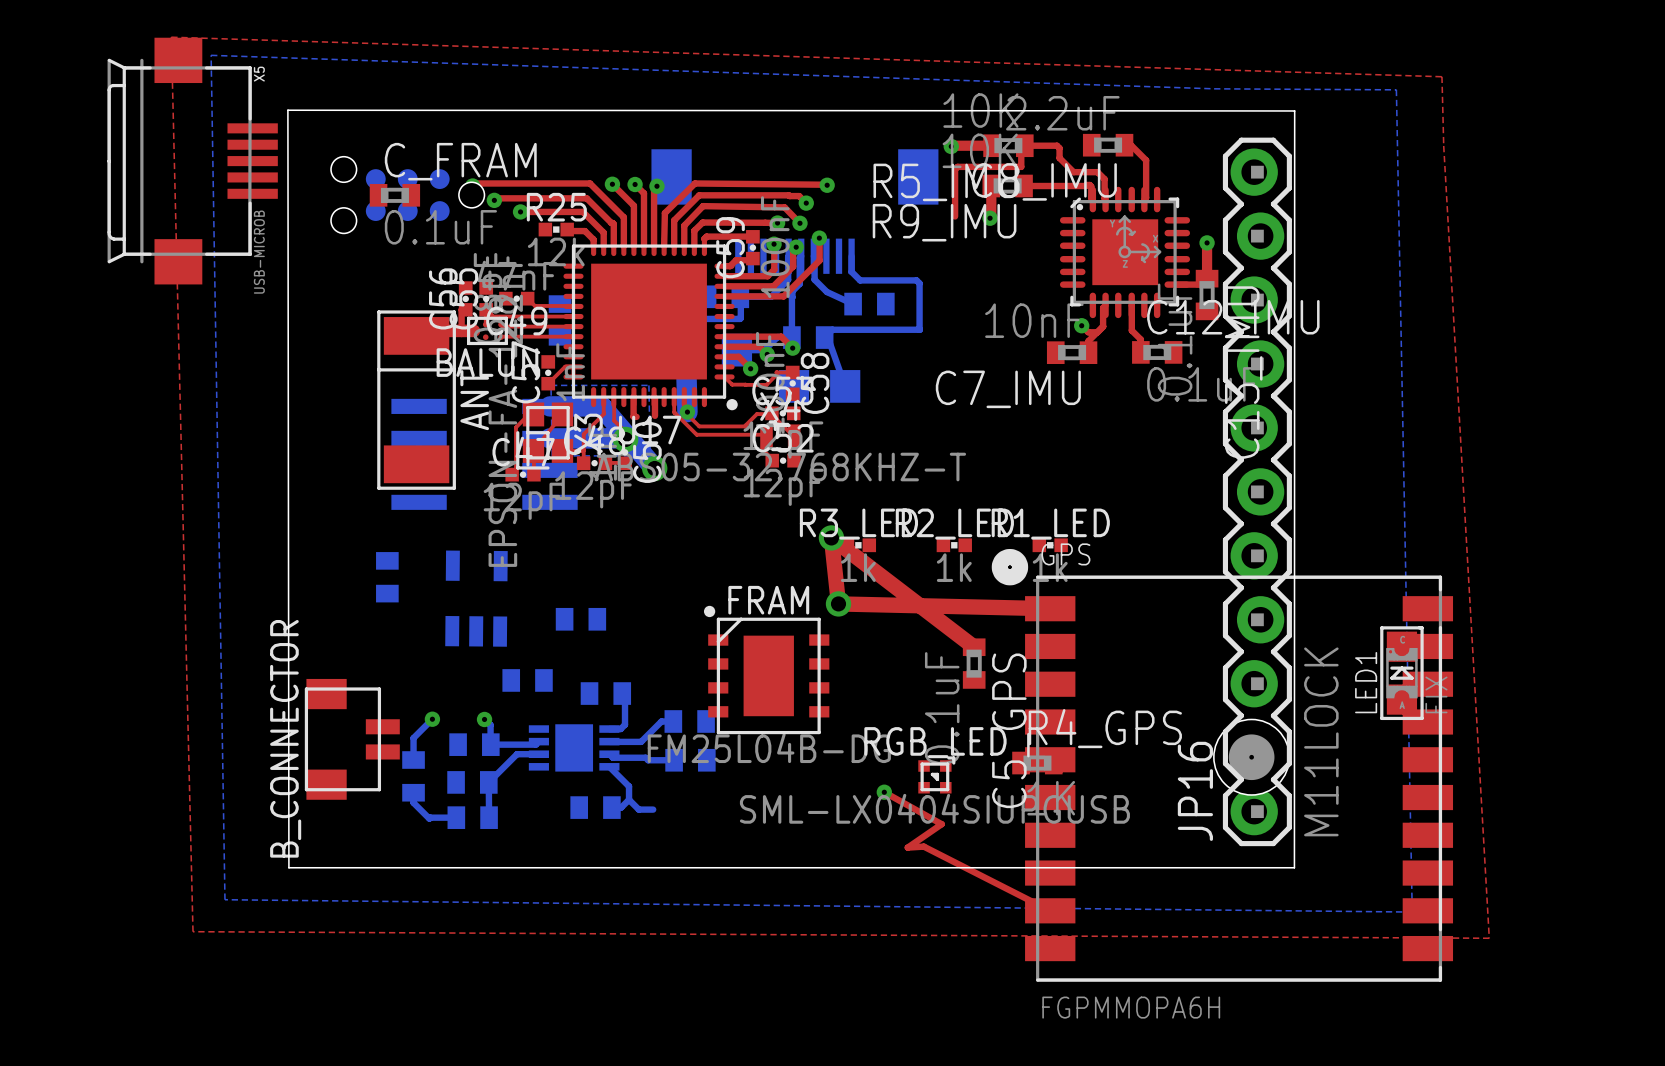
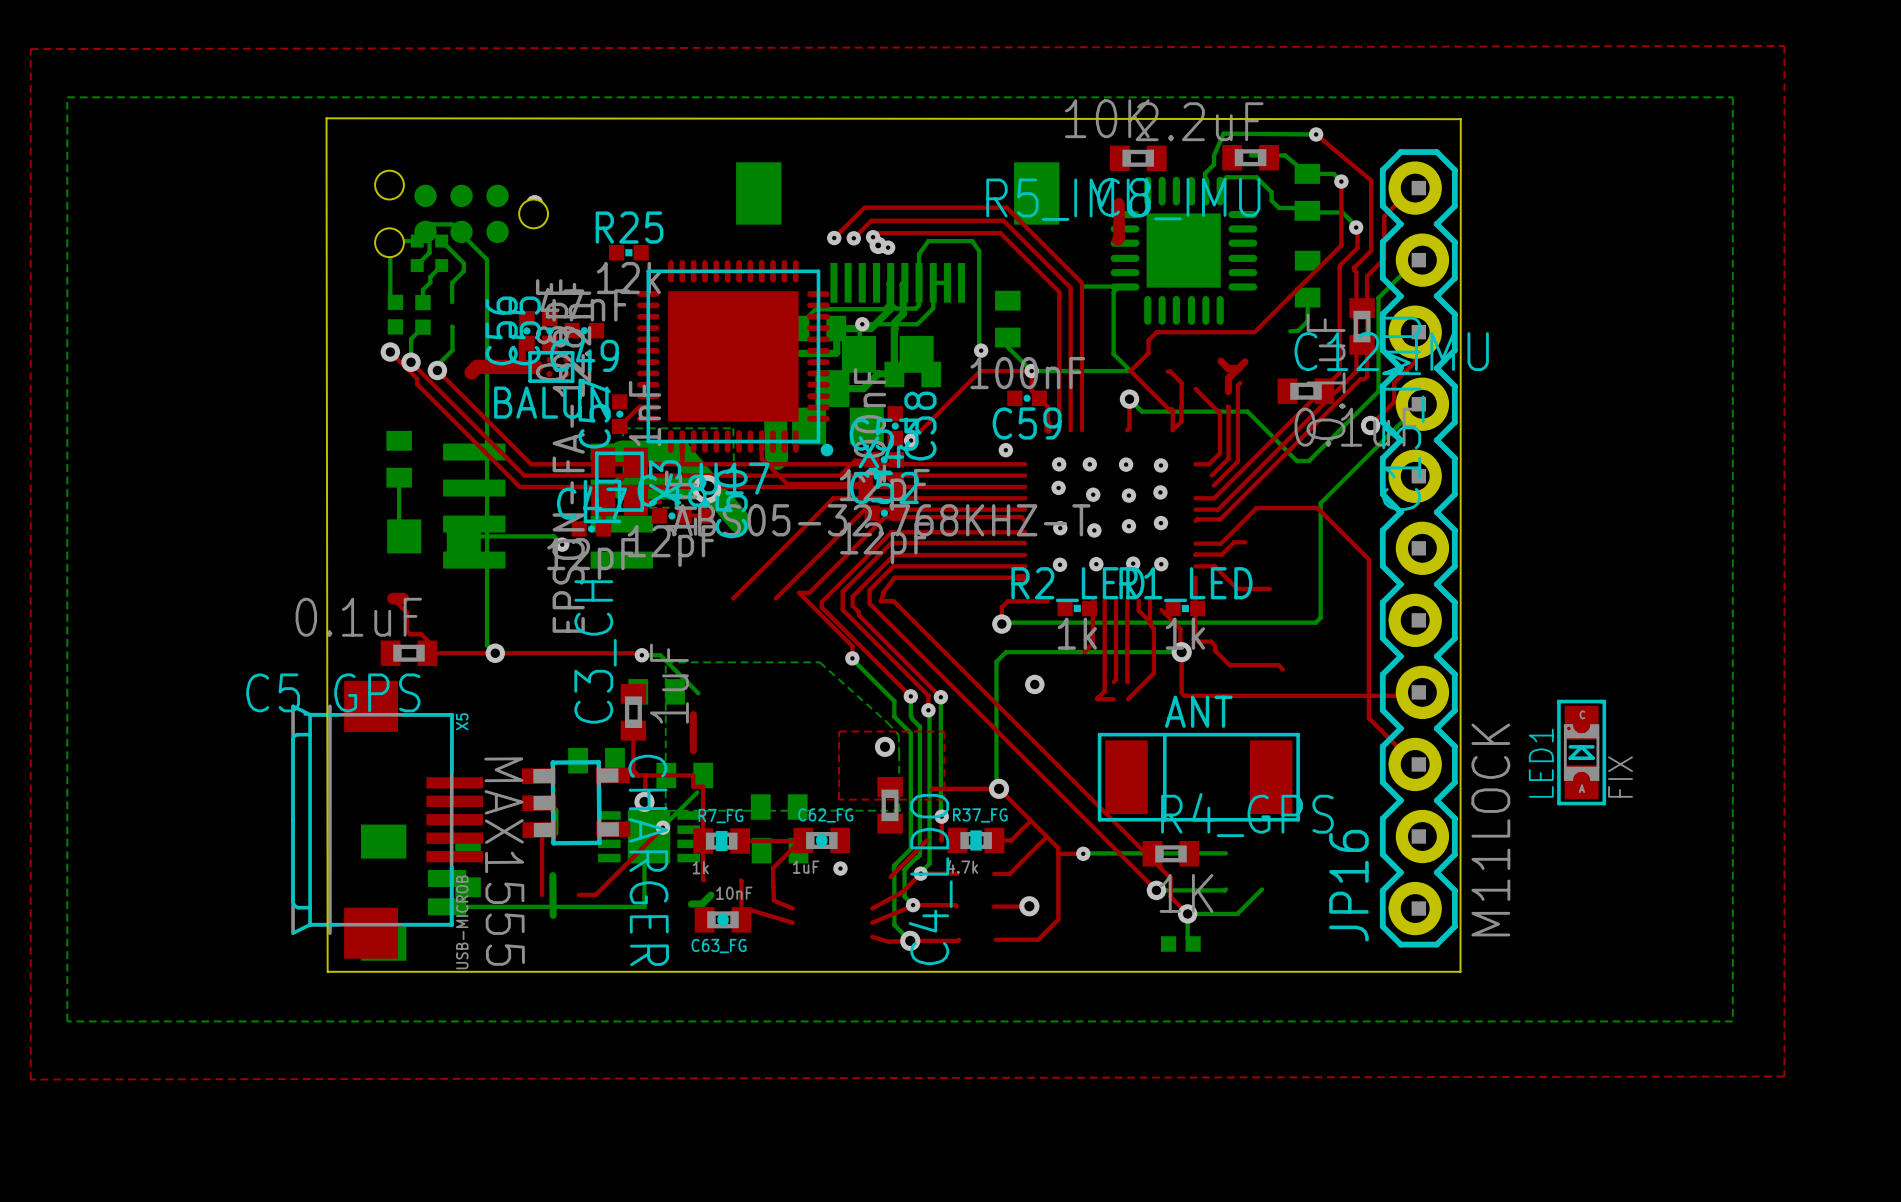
top zone outline: (171, 37) (1441, 76) (1443, 145) (1489, 938) (193, 931) (171, 37) -> (1784, 45) (30, 49) (30, 1079) (1784, 1076) (1784, 45)
bottom zone outline: (211, 55) (1214, 88) (1396, 89) (1412, 912) (224, 899) (211, 55) -> (67, 97) (67, 1021) (1732, 1021) (1732, 97) (67, 97)
top track: none -> (1316, 134) (1371, 180) (1371, 250) (1354, 267) (1356, 272) (1356, 371) (1218, 509) (1195, 509)
bottom track: none -> (1316, 134) (1223, 133) (1214, 155) (1214, 164) (1205, 173) (1205, 191)
via: none -> (1316, 134)
bottom track: none -> (1250, 155) (1285, 155) (1307, 173) (1333, 173) (1341, 181)
top track: (992, 145) (951, 146) -> none
top track: (1124, 145) (1131, 145) (1146, 160) (1146, 197) (1144, 199) -> none
via: (951, 146) -> none
X5 position: (192, 161) -> (387, 819)
top track: none -> (1341, 181) (1341, 245) (1254, 332) (1156, 332) (1148, 340) (1148, 353) (1130, 371) (1168, 409) (1172, 410) (1172, 430) (1181, 421) (1181, 406)
via: none -> (1341, 181)
top track: none -> (1415, 188) (1412, 188) (1384, 216) (1384, 259) (1367, 276) (1367, 376) (1364, 379) (1360, 379) (1220, 519) (1195, 520)
bottom track: none -> (1220, 191) (1220, 183) (1226, 177) (1256, 177) (1271, 192) (1271, 200) (1278, 207) (1292, 207) (1309, 212) (1342, 212) (1356, 227)
top track: (612, 184) (633, 205) (633, 246) -> none
via: (612, 184) -> none
top track: (635, 184) (643, 193) (643, 246) -> none
via: (635, 184) -> none
top track: (827, 184) (695, 183) (664, 213) (664, 246) -> none
via: (827, 185) -> none
top track: (472, 186) (475, 183) (590, 183) (623, 217) (623, 246) -> none
top track: (656, 186) (654, 189) (654, 246) -> none
via: (656, 186) -> none
R9_IMU side: top (1007, 186) -> bottom (1307, 192)
top track: (1024, 186) (1089, 185) (1092, 199) -> none
C_FRAM: 0.1uF (394, 195) -> none
top track: (1105, 199) (1104, 179) (1097, 172) (1073, 172) (1059, 158) (1059, 148) (1057, 145) (1024, 145) (1024, 150) (1021, 153) (1021, 166) (957, 166) (955, 169) (955, 216) -> none
top track: (494, 200) (496, 198) (586, 198) (613, 224) (613, 246) -> none
via: (494, 200) -> none
top track: (806, 203) (799, 196) (788, 195) (699, 195) (674, 220) (674, 246) -> none
via: (806, 203) -> none
top track: none -> (1356, 227) (1357, 247) (1339, 266)
via: none -> (1356, 227)
top track: (520, 211) (582, 211) (603, 232) (603, 246) -> none
via: (520, 211) -> none
top track: none -> (873, 237) (877, 233) (1000, 233) (1059, 292) (1059, 430)
via: none -> (873, 237)
top track: none -> (834, 238) (864, 207) (1006, 207) (1081, 282) (1081, 430)
via: none -> (834, 238)
top track: none -> (853, 238) (871, 220) (1003, 220) (1070, 287) (1070, 430)
via: none -> (853, 238)
via: (990, 218) -> none
bottom track: none -> (417, 241) (401, 241) (390, 252) (390, 297) (395, 302)
bottom track: none -> (441, 241) (463, 263) (463, 271) (452, 282) (452, 302)
top track: (777, 223) (702, 222) (694, 230) (694, 246) -> none
top track: (799, 223) (784, 207) (703, 206) (684, 225) (684, 246) -> none
via position: (799, 223) -> (888, 247)
top track: (567, 229) (584, 231) (593, 239) (593, 246) -> none
part: none -> (429, 253)
top track: (752, 236) (706, 236) (704, 239) -> none
bottom track: none -> (1422, 260) (1416, 260) (1378, 297) (1378, 391) (1309, 460) (1296, 460) (1247, 411) (1141, 411) (1129, 399)
top track: (819, 238) (819, 260) (783, 296) (724, 296) -> none
via: (819, 238) -> none
bottom track: none -> (417, 265) (429, 252) (429, 226) (431, 224) (451, 224) (487, 259) (487, 645) (495, 653)
bottom track: none -> (441, 265) (430, 276) (430, 282) (422, 289) (422, 302)
top track: none -> (1339, 266) (1339, 372) (1214, 498) (1195, 498)
top track: (1207, 242) (1207, 278) (1201, 284) (1177, 284) -> none
via: (1207, 242) -> none
top track: (774, 244) (774, 269) (767, 276) (724, 276) -> none
via: (774, 244) -> none
C59 rotation: 0° (752, 247) -> 90° clockwise (1027, 398)
C59 position: (752, 247) -> (1027, 398)
top track: (796, 247) (793, 250) (793, 266) (773, 286) (724, 286) -> none
via: (796, 247) -> none
part side: top (1125, 252) -> bottom (1183, 250)
bottom track: (813, 256) (814, 279) (826, 291) (853, 304) -> none
bottom track: none -> (947, 282) (933, 282) (933, 308) (917, 324) (862, 324) (859, 326) (859, 354)
bottom track: (851, 256) (851, 271) (860, 280) (916, 280) (919, 283) (919, 329) -> none
top track: (752, 258) (751, 260) (736, 260) (730, 266) (724, 266) -> none
bottom track: none -> (1082, 286) (1125, 286) (1118, 286) (1113, 292) (1113, 354) (1130, 371) (1031, 371) (1007, 347) (1007, 337)
bottom track: none -> (1307, 297) (1307, 321) (1298, 330) (1290, 331)
part: none -> (422, 314)
via: none -> (862, 324)
bottom track: none -> (422, 327) (411, 339) (411, 362)
bottom track: none -> (452, 326) (452, 350) (437, 365) (437, 370)
top track: (527, 298) (534, 305) (573, 306) -> none
top track: none -> (1415, 332) (1415, 361) (1394, 382) (1394, 401) (1370, 425)
bottom track: none -> (801, 337) (801, 323) (815, 309) (884, 309) (890, 302) (896, 308) (915, 308) (919, 305) (919, 254) (928, 241) (972, 241) (979, 251) (979, 348) (981, 350)
part rotation: 0° (869, 304) -> 90° clockwise (1007, 319)
top track: (1105, 305) (1103, 307) (1103, 326) -> none
top track: (1131, 305) (1131, 330) (1140, 339) (1140, 352) -> none
top track: (573, 316) (492, 316) (486, 309) (485, 324) -> none
via: none -> (981, 350)
top track: none -> (390, 352) (417, 378) (417, 384) (519, 486) (1025, 486)
via: none -> (390, 352)
part: none -> (887, 354)
C4_LDO side: bottom (560, 320) -> top (890, 805)
top track: (500, 324) (503, 326) (573, 326) -> none
via: (1081, 325) -> none
top track: none -> (411, 362) (524, 475) (1025, 475)
via: none -> (411, 362)
bottom track: (919, 329) (832, 329) (824, 337) (829, 342) (845, 386) -> none
top track: none -> (437, 370) (531, 464) (1025, 464)
via: none -> (437, 370)
via: none -> (1031, 371)
top track: none -> (1167, 371) (1170, 371) (1181, 382) (1181, 406)
top track: (573, 336) (500, 337) -> none
top track: (724, 336) (781, 336) (792, 348) -> none
top track: none -> (1240, 382) (1237, 385) (1237, 461) (1213, 485)
top track: (724, 346) (759, 346) (767, 354) -> none
via: (792, 348) -> none
top track: none -> (1195, 388) (1219, 412)
C7_IMU side: top (1072, 352) -> bottom (1307, 279)
via: (767, 354) -> none
top track: (724, 356) (738, 356) (750, 368) -> none
top track: none -> (1129, 399) (1129, 428) (1127, 430)
via: none -> (1129, 399)
bottom track: none -> (1422, 404) (1419, 404) (1320, 503) (1320, 617) (1315, 622) (1001, 624)
top track: none -> (1227, 406) (1228, 458) (1211, 475)
via: (750, 368) -> none
top track: none -> (1219, 412) (1219, 453) (1209, 464) (1195, 464)
top track: (776, 372) (776, 374) (766, 384) (745, 384) -> none
top track: (776, 372) (792, 372) -> none
top track: (724, 376) (732, 384) (745, 384) -> none
via: none -> (1370, 425)
part: none -> (837, 426)
part: (819, 386) -> none
top track: none -> (1047, 430) (1047, 406) (1031, 390) (1031, 371) (980, 371) (911, 440)
via: none -> (911, 440)
top track: (613, 397) (614, 420) (625, 431) (625, 441) -> none
top track: (633, 397) (633, 416) (636, 416) -> none
top track: (654, 397) (654, 415) -> none
ANT: (416, 400) -> none
via: none -> (1005, 450)
top track: (684, 411) (699, 426) (745, 425) -> none
part: none -> (399, 459)
via: (687, 412) -> none
top track: (604, 413) (583, 434) (583, 463) -> none
top track: (533, 414) (528, 414) (516, 427) (516, 470) (512, 474) -> none
via: none -> (1059, 464)
via: none -> (1089, 464)
via: none -> (1126, 464)
via: none -> (1160, 465)
bottom track: none -> (399, 477) (399, 531) (404, 536)
via: none -> (1058, 487)
via: none -> (1160, 492)
via: none -> (1093, 494)
via: none -> (1128, 495)
top track: none -> (1025, 498) (833, 498) (733, 598)
top track: none -> (1025, 509) (864, 509) (775, 598)
top track: none -> (1025, 520) (1021, 517) (885, 517) (809, 592) (799, 592) (852, 646) (852, 658)
via: (654, 468) -> none
via: none -> (1160, 523)
via: none -> (1128, 526)
via: none -> (1060, 528)
via: none -> (1094, 530)
top track: none -> (1025, 532) (891, 532) (821, 601) (821, 607) (910, 696)
part: none -> (434, 536)
bottom track: none -> (463, 536) (554, 536) (562, 544)
top track: none -> (1245, 542) (1234, 542) (1221, 554) (1195, 555)
top track: none -> (1025, 543) (891, 542) (842, 591) (842, 609) (928, 695) (928, 710)
top track: none -> (1195, 543) (1220, 543) (1256, 508) (1317, 508) (1368, 559) (1368, 718) (1415, 764)
via: none -> (562, 544)
top track: none -> (1025, 555) (894, 555) (852, 596) (852, 605) (858, 612) (858, 615) (940, 697)
via: none -> (1096, 564)
via: none -> (1133, 563)
via: none -> (1161, 564)
via: none -> (1060, 564)
top track: none -> (1025, 566) (893, 566) (869, 590) (869, 603) (1156, 890)
top track: none -> (1195, 566) (1214, 565) (1237, 588) (1269, 588)
top track: none -> (1018, 577) (1025, 577) (894, 577) (883, 592) (880, 601) (893, 601) (1170, 878) (1170, 896) (1187, 913)
top track: none -> (1195, 577) (1195, 638) (1198, 641) (1211, 641) (1215, 645) (1215, 650) (1229, 665) (1278, 665) (1282, 669)
top track: none -> (403, 598) (392, 598) (406, 612) (406, 630) (410, 634) (421, 634) (427, 640) (427, 653) (639, 653) (641, 655)
via: (831, 537) -> none
top track: none -> (1047, 600) (1007, 601) (1001, 607) (1001, 624)
top track: none -> (1093, 600) (1092, 643) (1084, 652)
top track: none -> (1104, 600) (1104, 691) (1097, 698) (1113, 699)
top track: none -> (1116, 600) (1116, 679) (1113, 682)
top track: none -> (1127, 600) (1127, 682)
top track: none -> (1138, 600) (1138, 610) (1153, 628) (1153, 673) (1127, 699)
top track: none -> (1150, 600) (1149, 623)
R3_LED side: top (858, 545) -> bottom (395, 314)
top track: none -> (1161, 609) (1180, 628)
via: none -> (1001, 624)
top track: none -> (1180, 628) (1181, 692) (1184, 695) (1419, 695) (1422, 692)
C3_CH side: bottom (387, 577) -> top (633, 712)
bottom track: none -> (1181, 652) (1006, 652) (996, 661) (996, 786) (999, 788)
via: none -> (1181, 652)
via: none -> (495, 653)
bottom track: none -> (643, 653) (641, 655) (660, 655) (698, 693)
via: none -> (641, 655)
bottom track: none -> (852, 658) (894, 701) (894, 716) (910, 733) (910, 848) (894, 865) (894, 924) (910, 940)
via: none -> (852, 658)
bottom zone outline: none -> (665, 662) (665, 810) (900, 810) (899, 808) (898, 734) (819, 662) (665, 662)
CHARGER side: bottom (476, 598) -> top (576, 802)
via: (838, 603) -> none
top track: (1050, 608) (838, 603) (831, 537) (974, 647) -> none
via: none -> (1034, 684)
bottom track: none -> (910, 696) (910, 716) (919, 726) (919, 855) (904, 869) (904, 896) (913, 905)
via: none -> (910, 696)
bottom track: none -> (940, 697) (941, 816)
via: none -> (940, 697)
bottom track: none -> (928, 710) (929, 863) (919, 872) (920, 873)
via: none -> (928, 710)
top track: none -> (693, 714) (693, 750)
top track: none -> (633, 730) (633, 770) (638, 775)
top zone outline: none -> (839, 731) (944, 731) (944, 799) (839, 799) (839, 731)
C5_GPS rotation: 0° (974, 663) -> 90° clockwise (409, 653)
C5_GPS position: (974, 663) -> (409, 653)
via: none -> (885, 746)
FRAM: FM25L04B-DG (766, 670) -> none
top track: none -> (612, 775) (693, 775) (693, 786) (703, 786) (704, 880)
top track: none -> (645, 775) (644, 801)
bottom track: (622, 693) (625, 696) (625, 724) (620, 729) (609, 729) -> none
ANT: none -> (1198, 777)
via: none -> (999, 788)
top track: none -> (932, 789) (999, 788) (1058, 848) (1058, 919) (1038, 939) (995, 939)
bottom track: none -> (697, 792) (662, 827)
bottom track: none -> (644, 801) (644, 906) (447, 906)
via: none -> (644, 801)
bottom track: (432, 719) (413, 738) (413, 760) -> none
via: (432, 719) -> none
via: (484, 719) -> none
bottom track: (673, 721) (661, 721) (641, 741) (609, 741) -> none
top track: none -> (941, 816) (941, 840)
via: none -> (941, 816)
top track: none -> (1030, 820) (1011, 840) (994, 840)
B_CONNECTOR: (352, 739) -> none
top track: none -> (662, 827) (595, 894) (578, 894)
via: none -> (662, 827)
top track: none -> (539, 830) (542, 832) (542, 894)
bottom track: (538, 741) (535, 744) (490, 744) -> none
C63_FG side: bottom (474, 744) -> top (723, 919)
top track: none -> (1046, 836) (1009, 873) (994, 873)
top track: none -> (740, 841) (803, 841)
top track: none -> (803, 840) (800, 840) (773, 867) (773, 886)
top track: none -> (926, 840) (890, 877)
bottom track: (538, 754) (517, 754) (488, 782) (491, 785) -> none
bottom track: (609, 754) (612, 757) (674, 760) -> none
top track: none -> (1058, 853) (1083, 853)
bottom track: none -> (1225, 853) (1083, 853)
via: none -> (1083, 853)
GPS: FGPMMOPA6H (1222, 765) -> none
bottom track: (609, 766) (629, 786) (629, 799) (638, 809) (653, 809) -> none
RGB_LED: SML-LX0404SIUPGUSB (936, 774) -> none
via: none -> (840, 868)
via: none -> (920, 873)
top track: none -> (957, 873) (920, 873) (902, 892) (872, 908)
C62_FG side: bottom (472, 782) -> top (821, 840)
top track: none -> (740, 880) (741, 919) (751, 910) (792, 922)
bottom track: (413, 792) (413, 802) (429, 818) (456, 817) -> none
top track: none -> (773, 886) (773, 900) (792, 908)
top track: (884, 792) (941, 824) (907, 847) (923, 846) (1050, 910) -> none
via: (884, 792) -> none
bottom track: none -> (1225, 889) (1156, 890)
bottom track: none -> (1261, 889) (1237, 913) (1187, 913) (1187, 938) (1193, 944)
via: none -> (1156, 890)
part: none -> (413, 892)
R37_FG side: bottom (595, 807) -> top (976, 840)
via: none -> (913, 905)
top track: none -> (956, 906) (913, 905) (872, 922)
top track: none -> (993, 906) (1029, 906)
via: none -> (1029, 906)
via: none -> (1187, 913)
R7_FG side: bottom (472, 817) -> top (721, 841)
top track: none -> (872, 936) (888, 941) (959, 939)
via: none -> (910, 940)
part: none -> (1180, 944)

